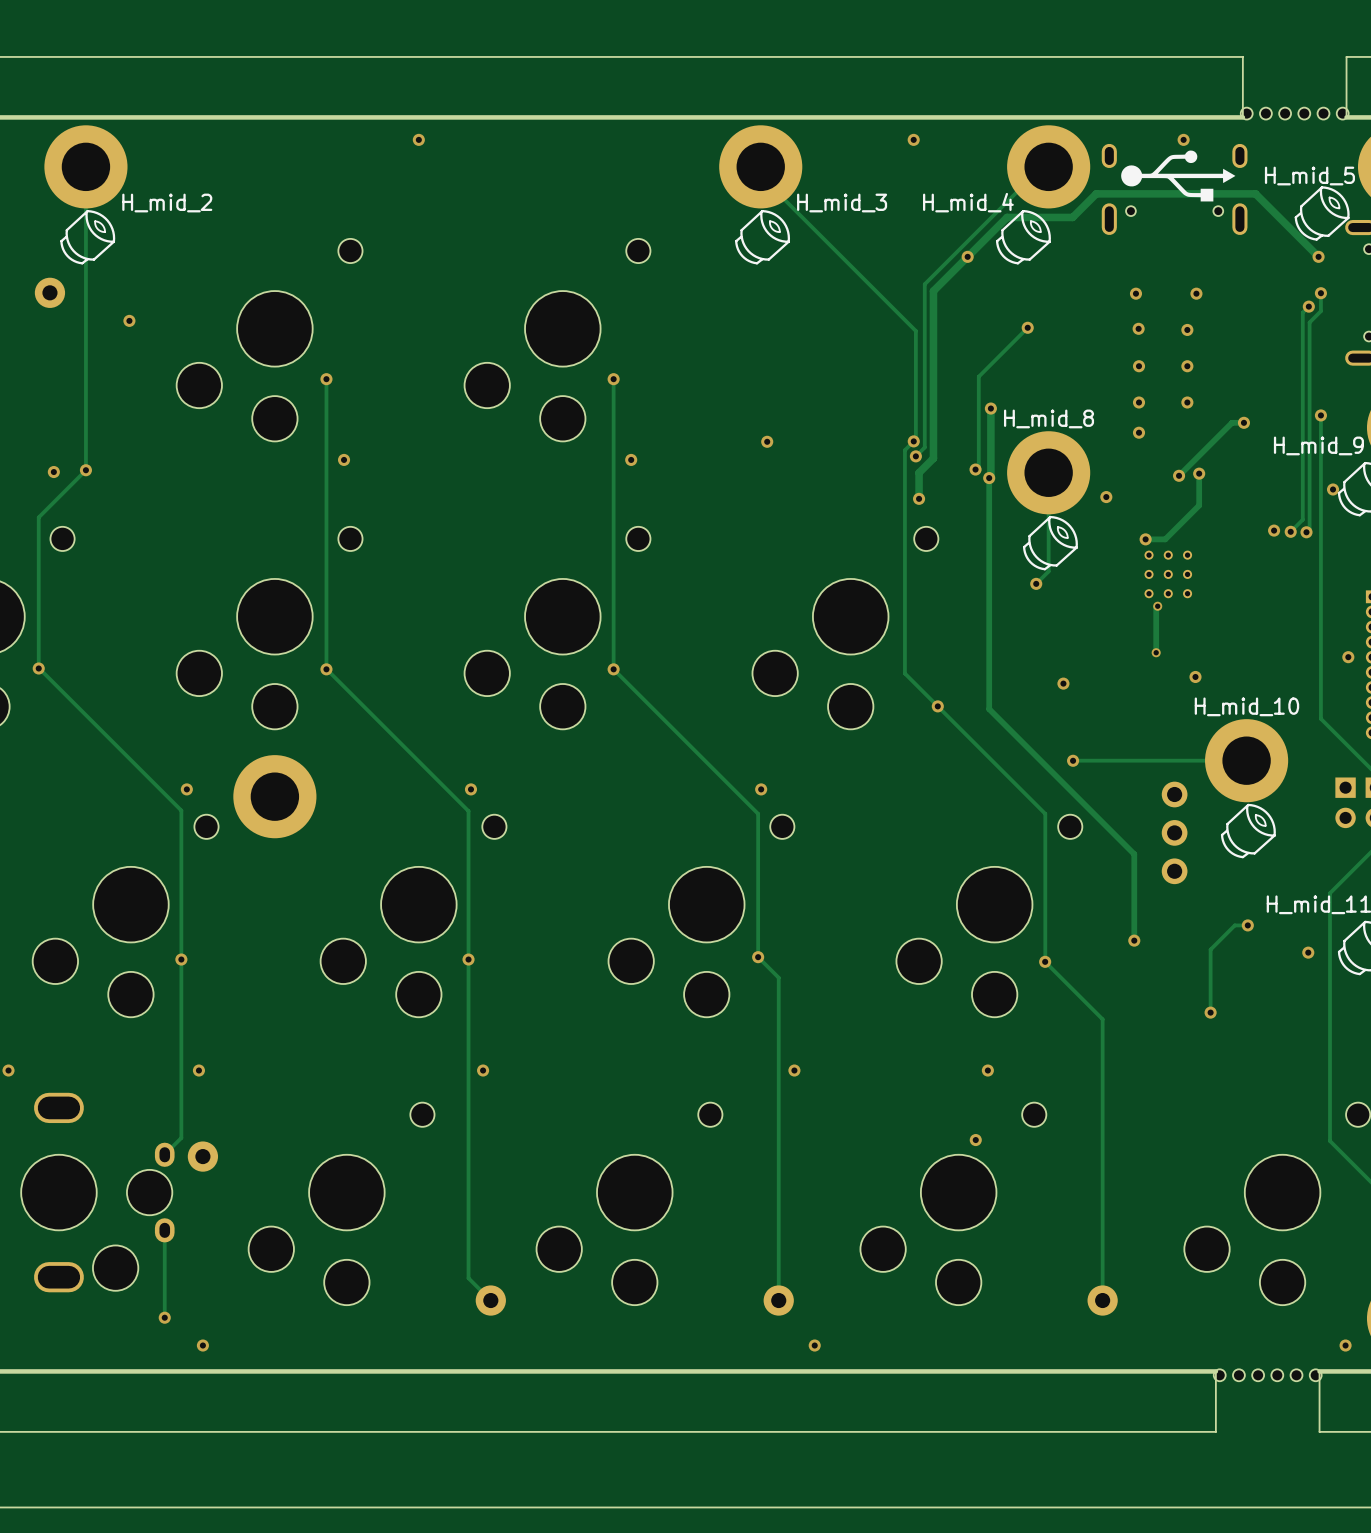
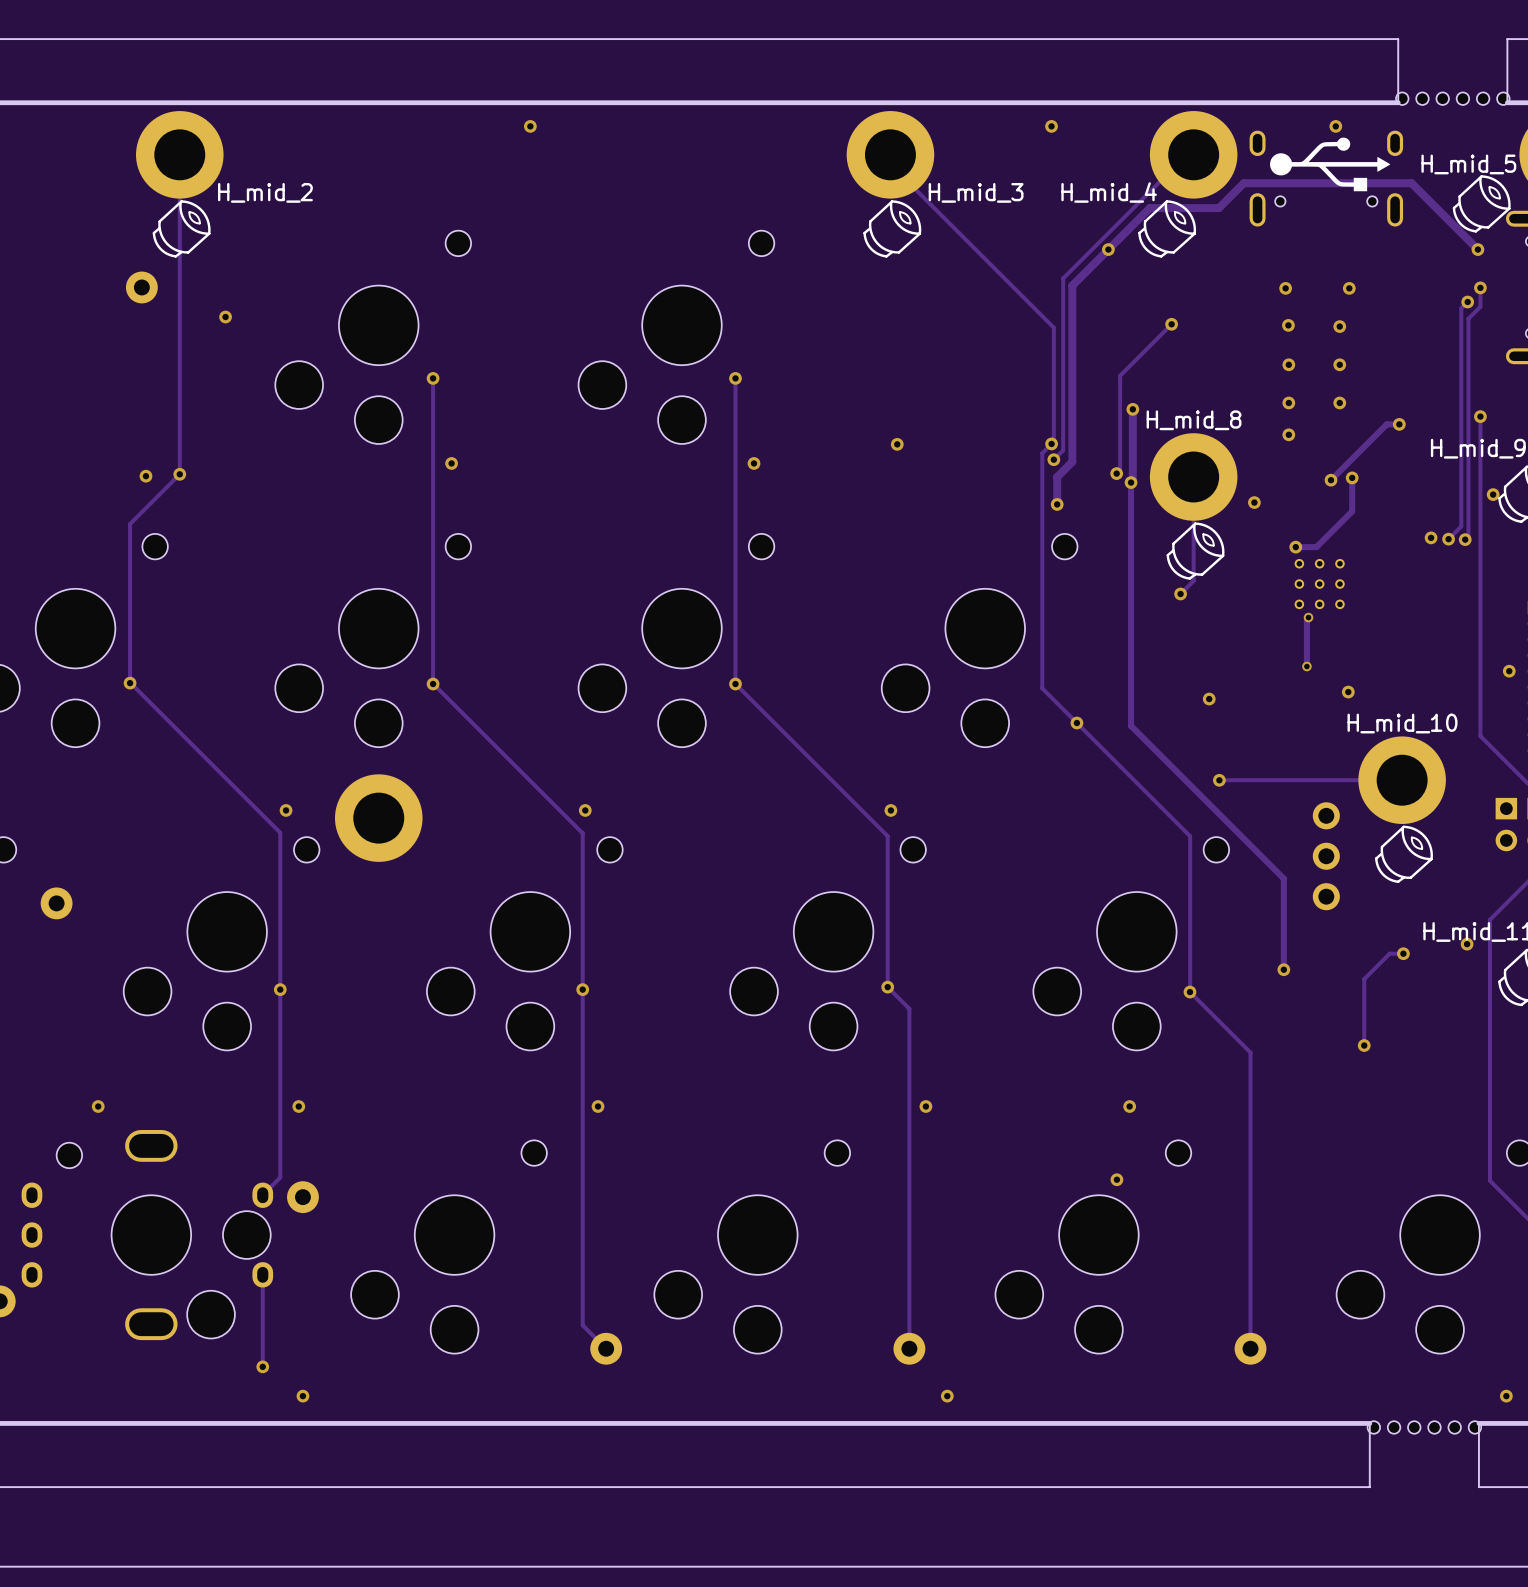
via position: (1308, 952) -> (1467, 944)

